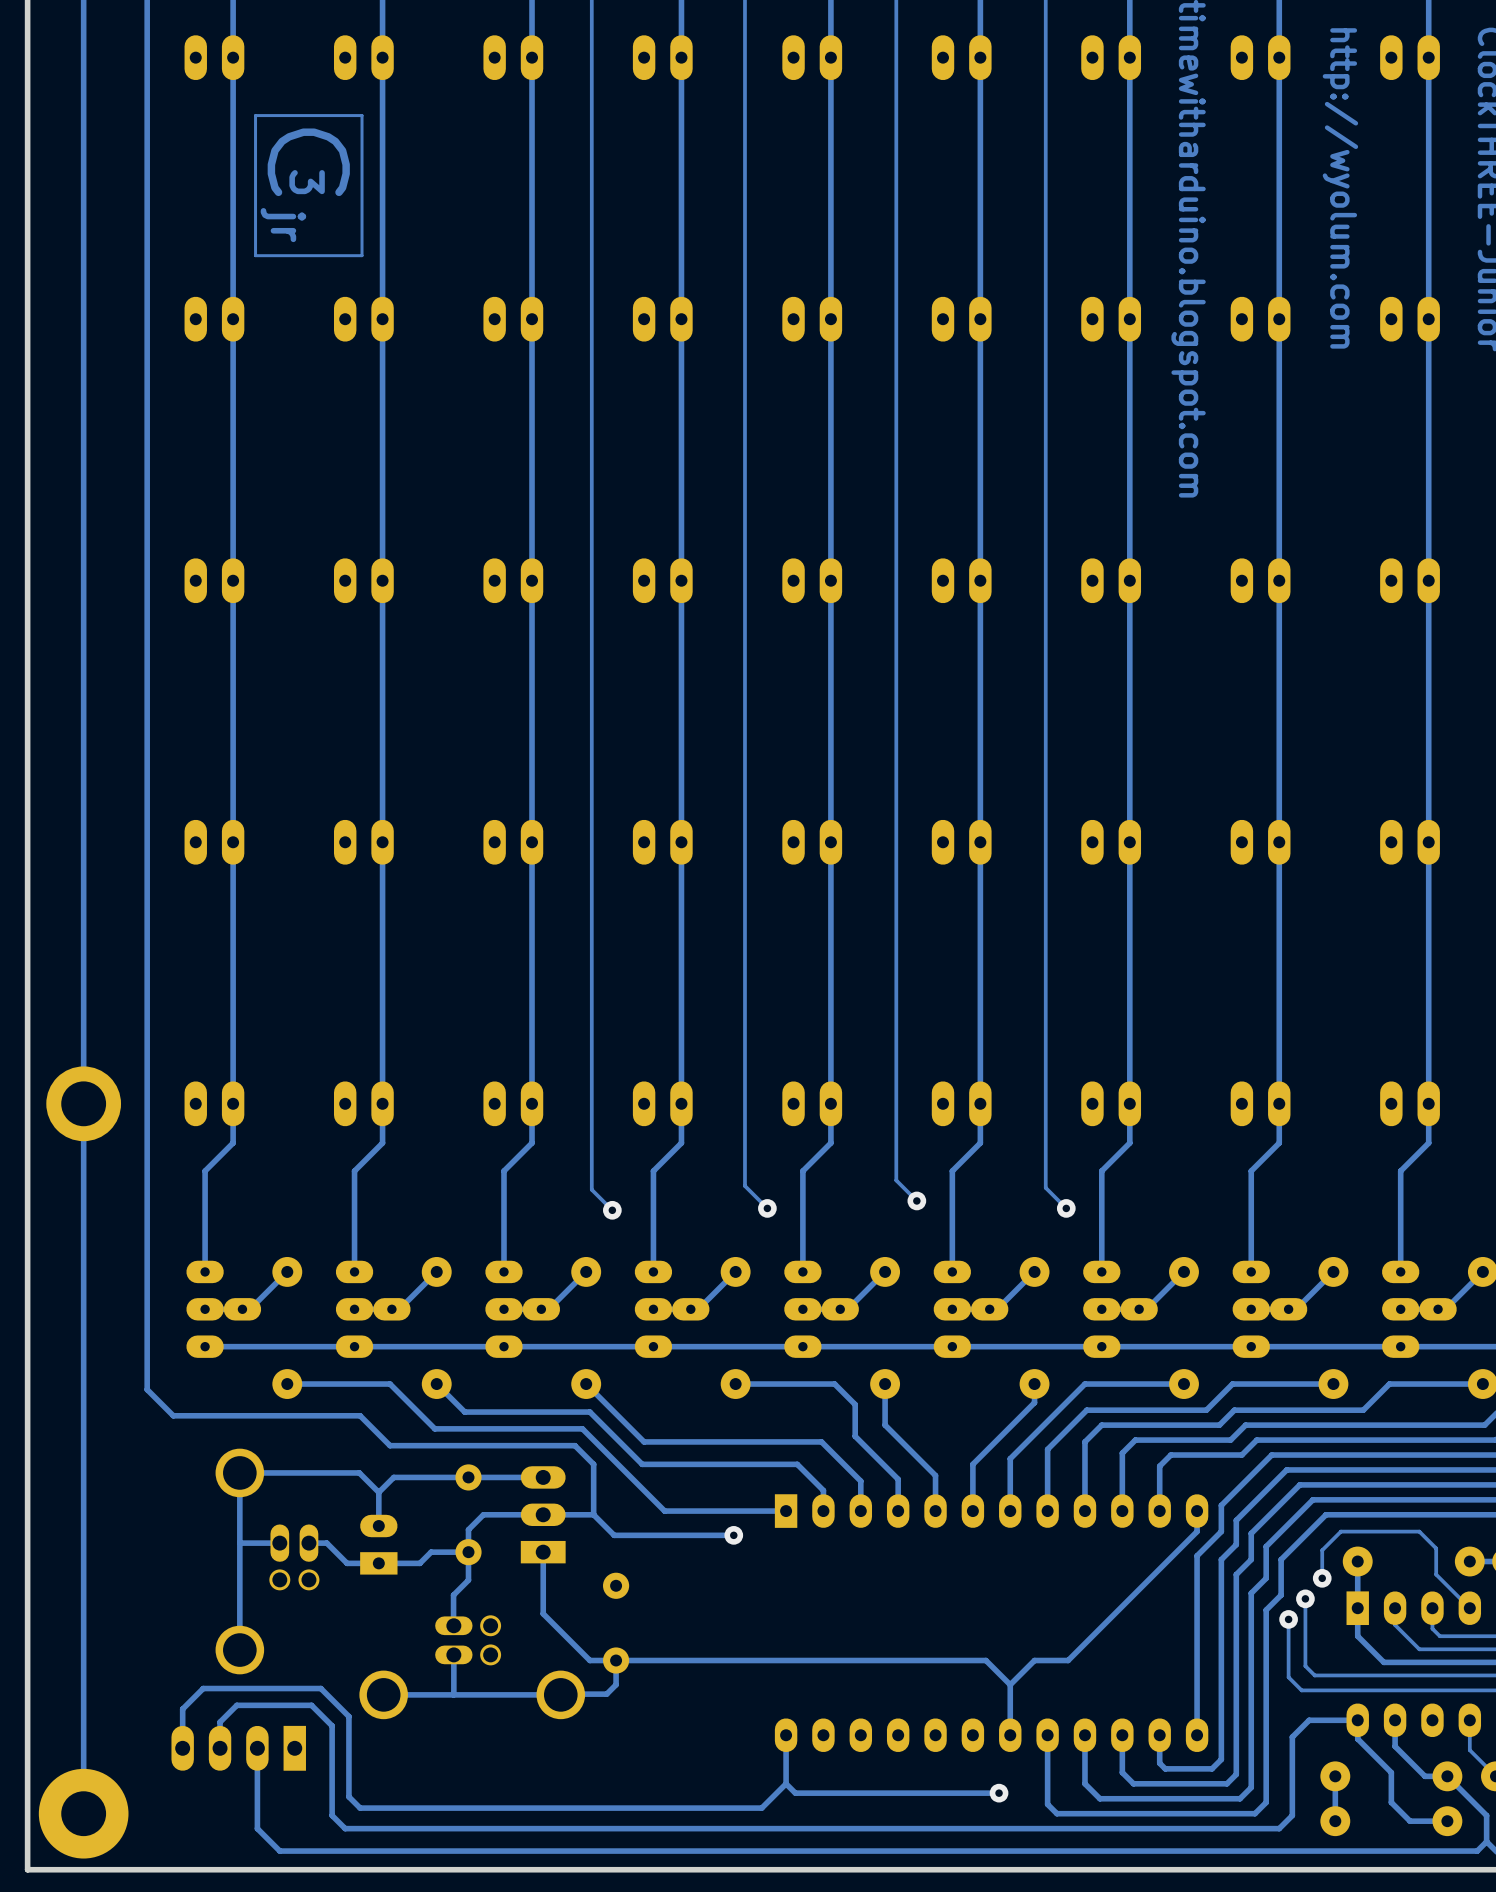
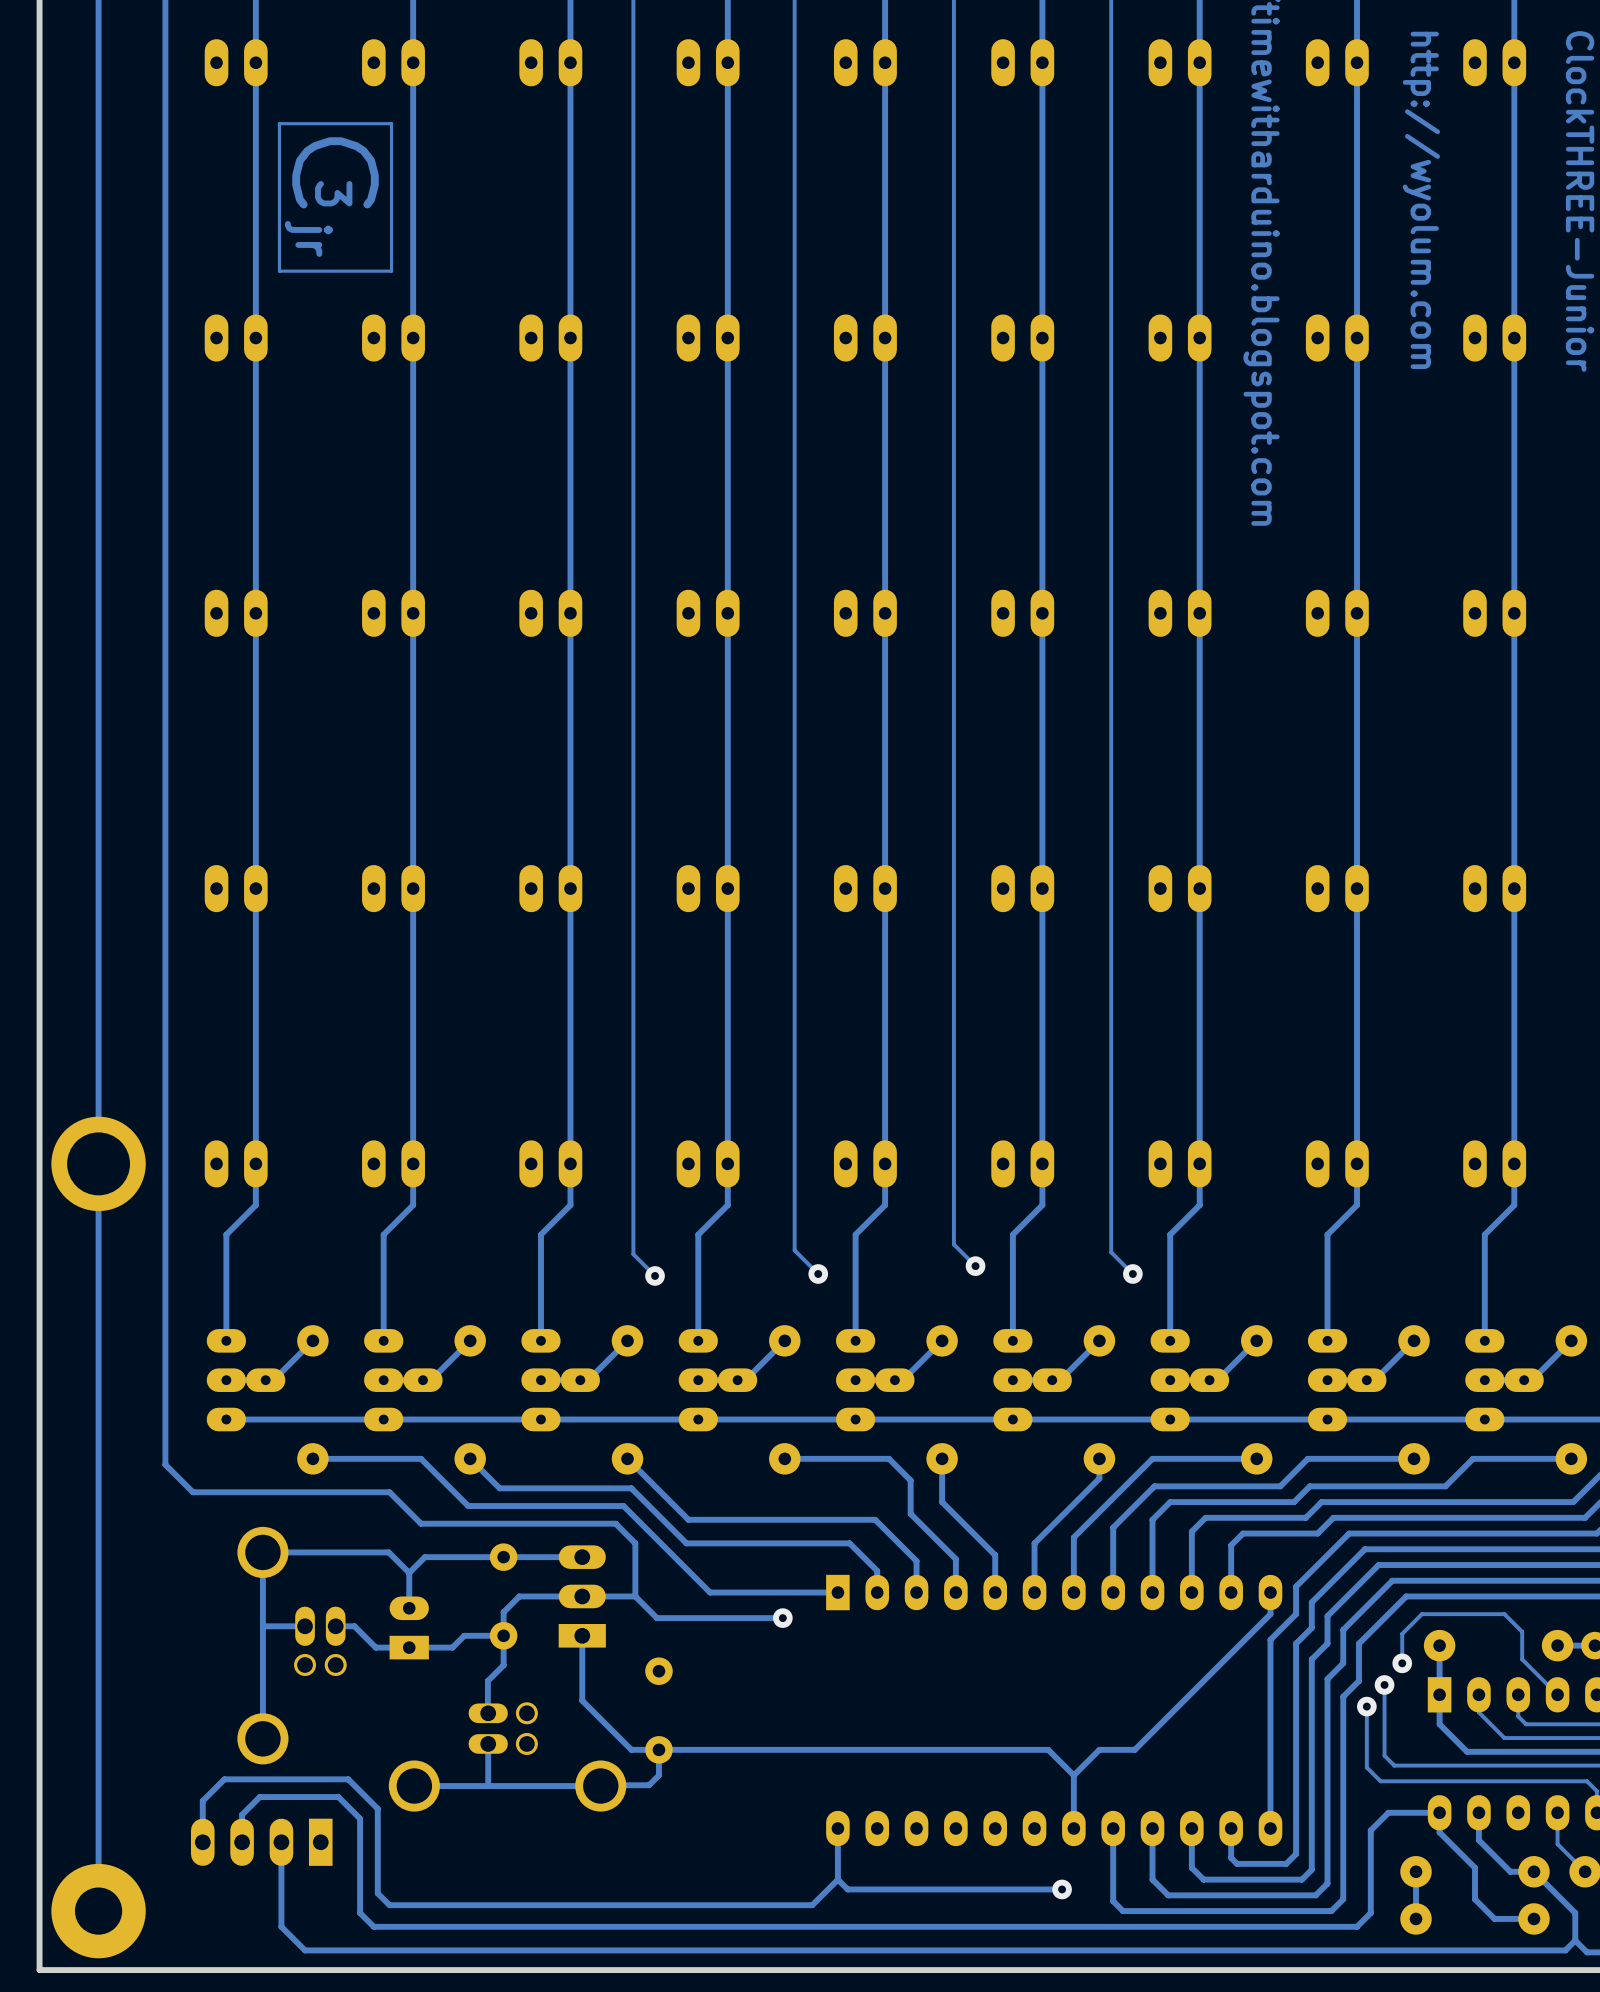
part footprint: [46, 1066, 122, 1142] -> [51, 1116, 146, 1212]

